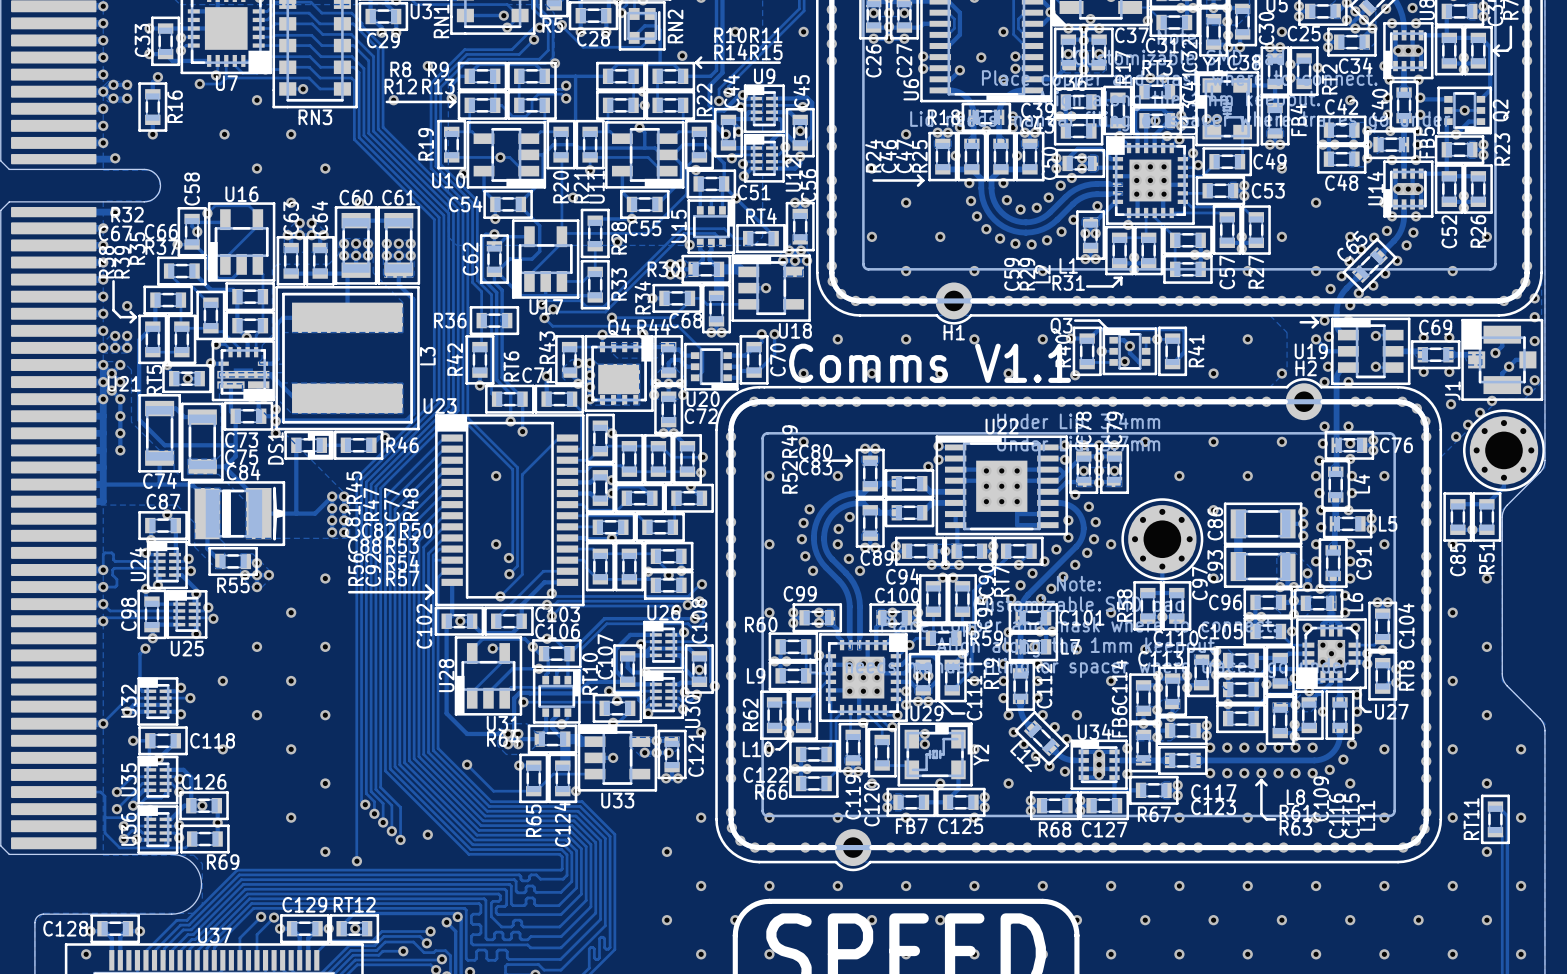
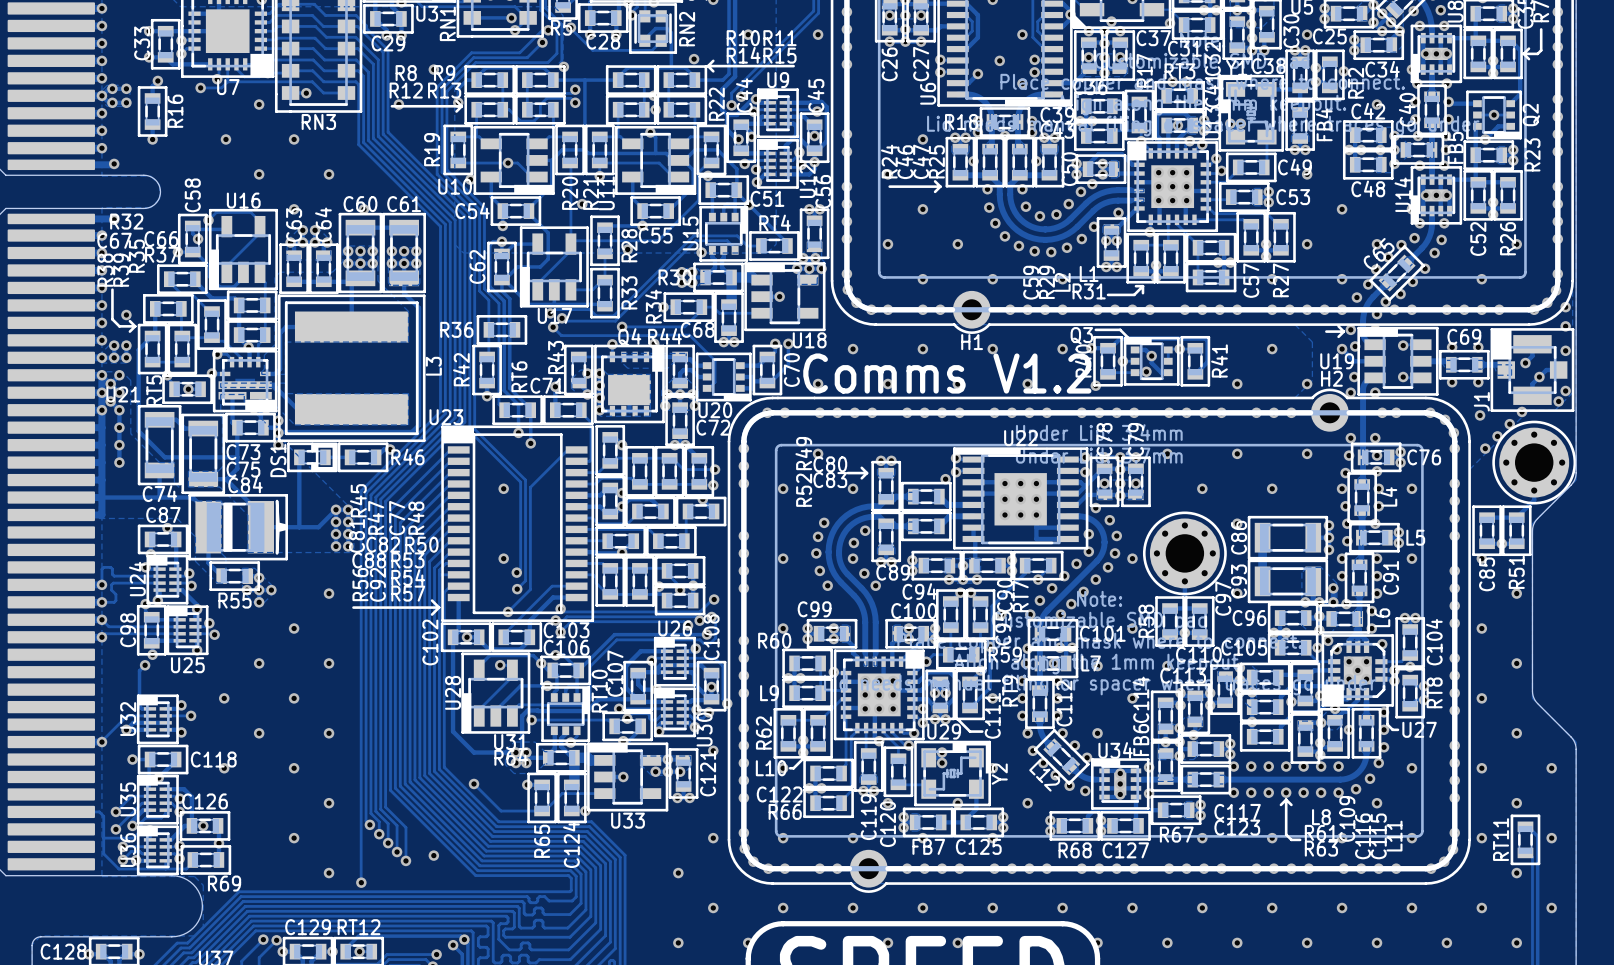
text: Comms V1.1 (930, 363) -> Comms V1.2 (947, 373)
via: none -> (1328, 640)
via: (1307, 628) -> none
via: none -> (1336, 649)

